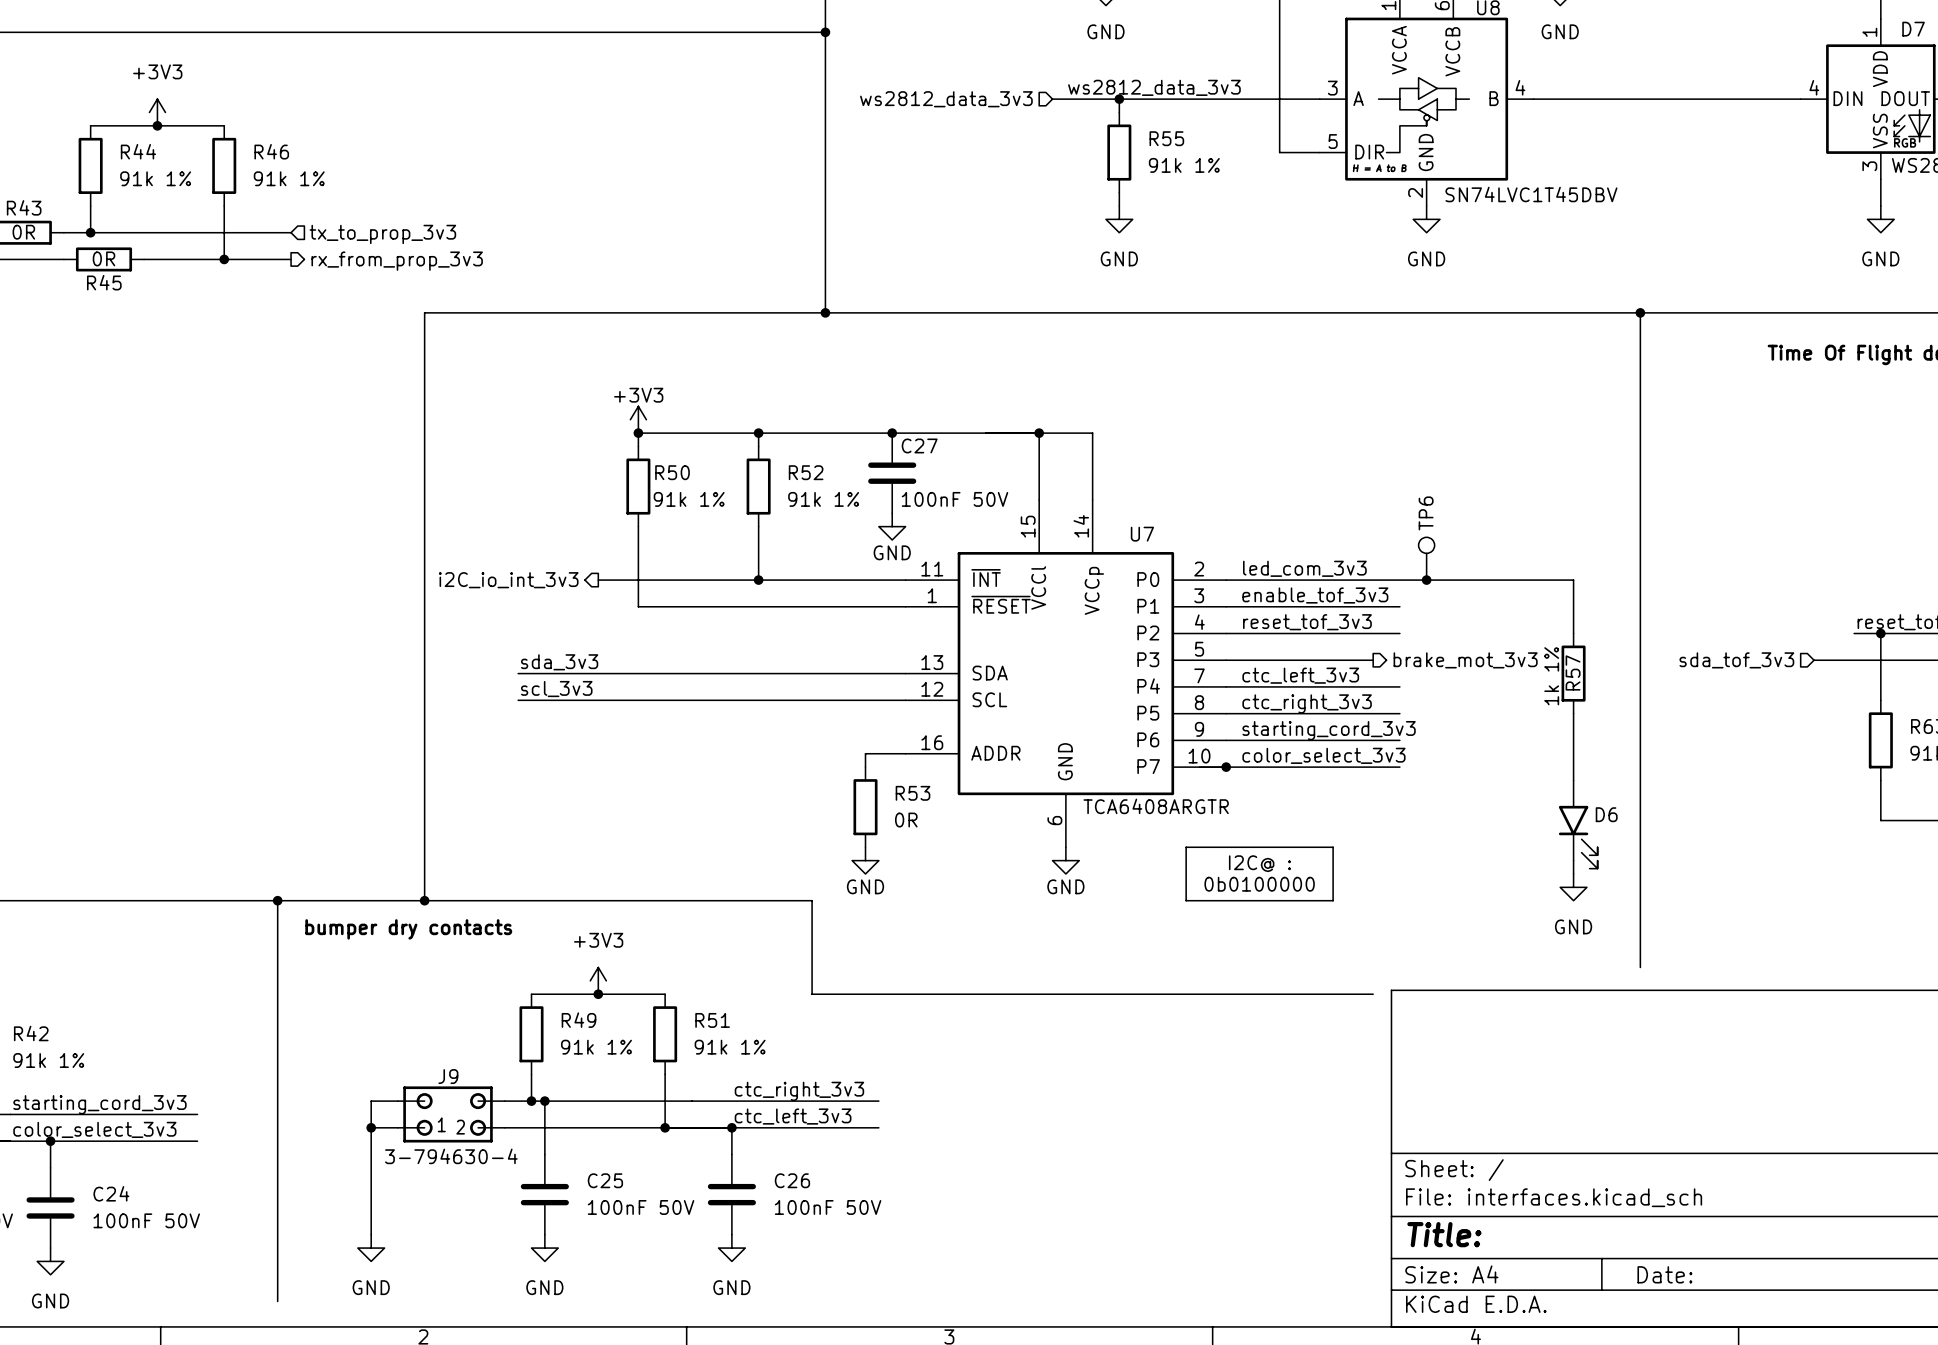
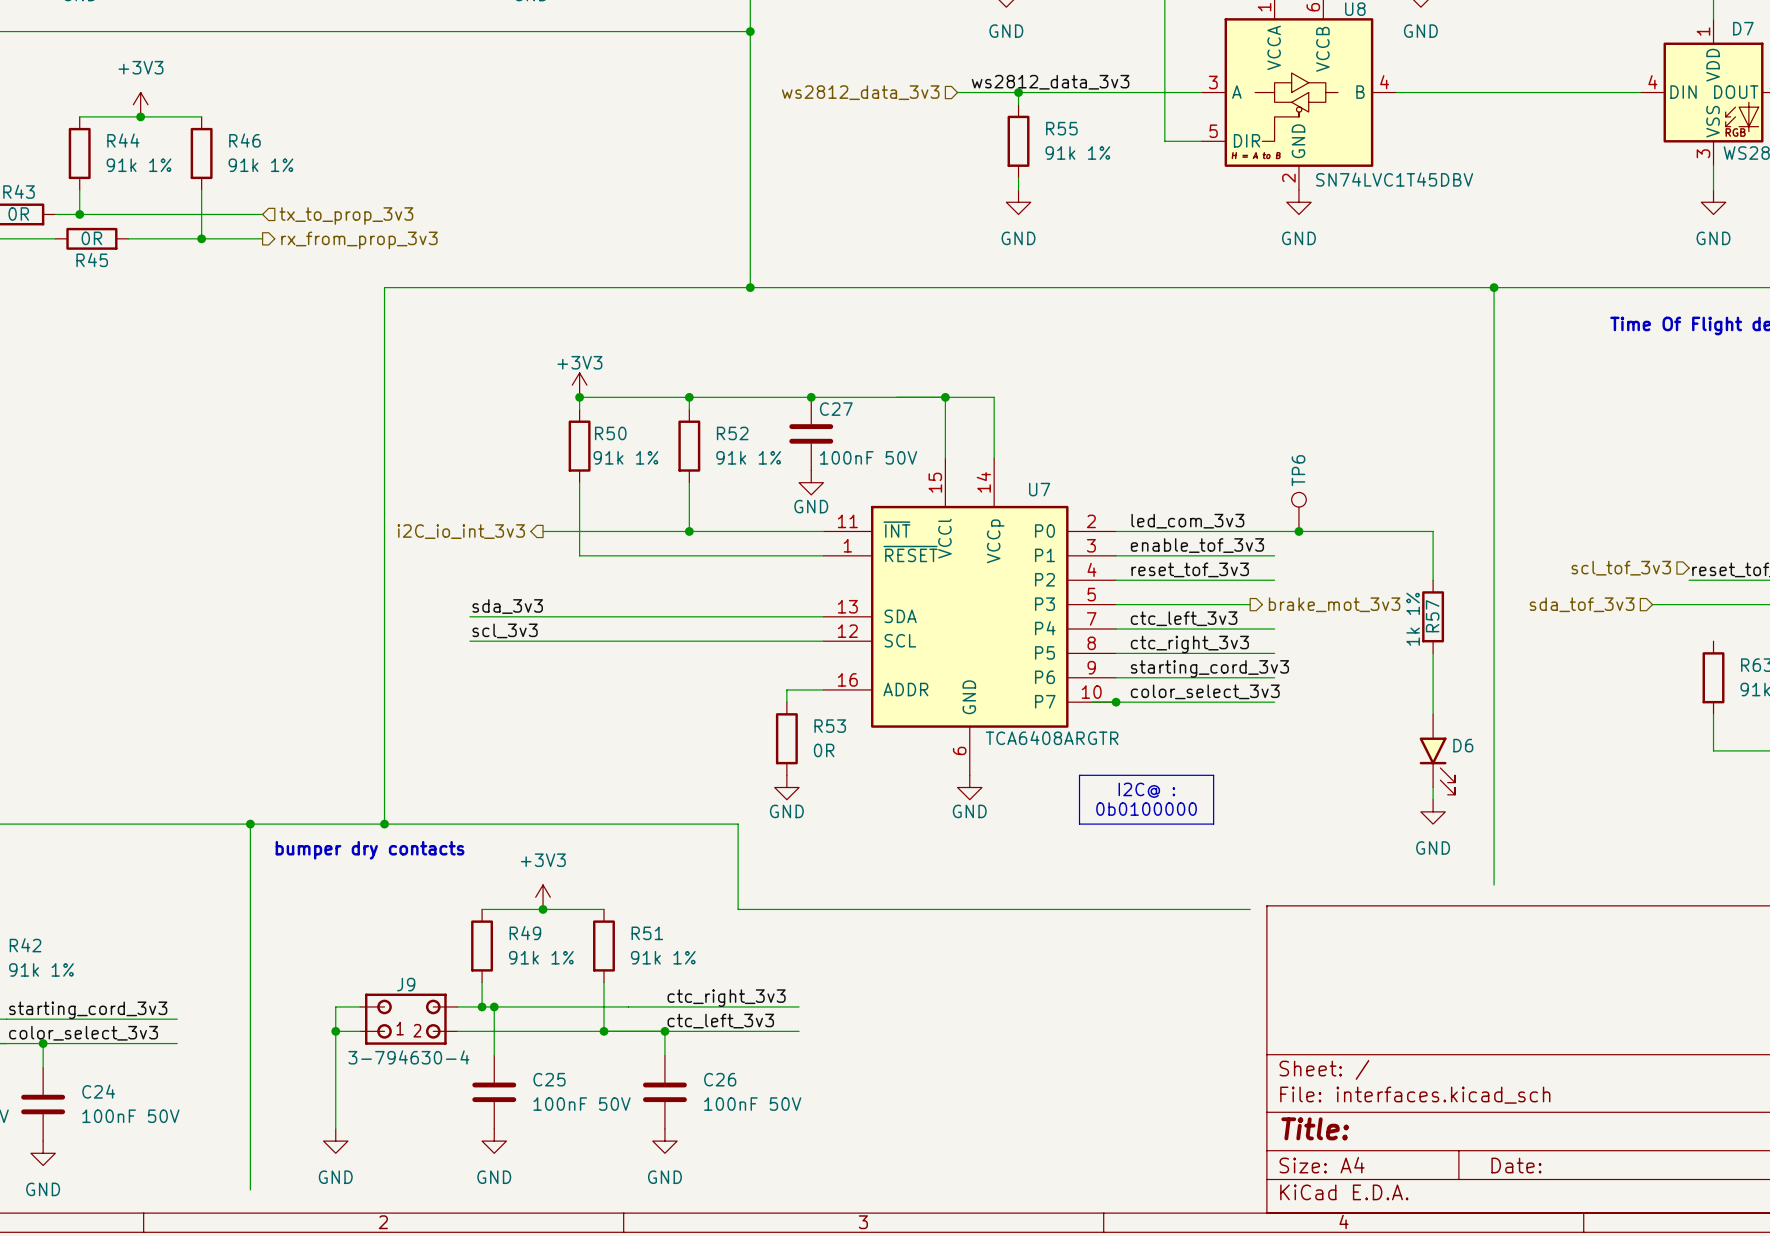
hierarchical label: none -> scl_tof_3v3 (1621, 568)
wire: (1880, 633) (1880, 700) -> none
junction: (1880, 633) -> none

